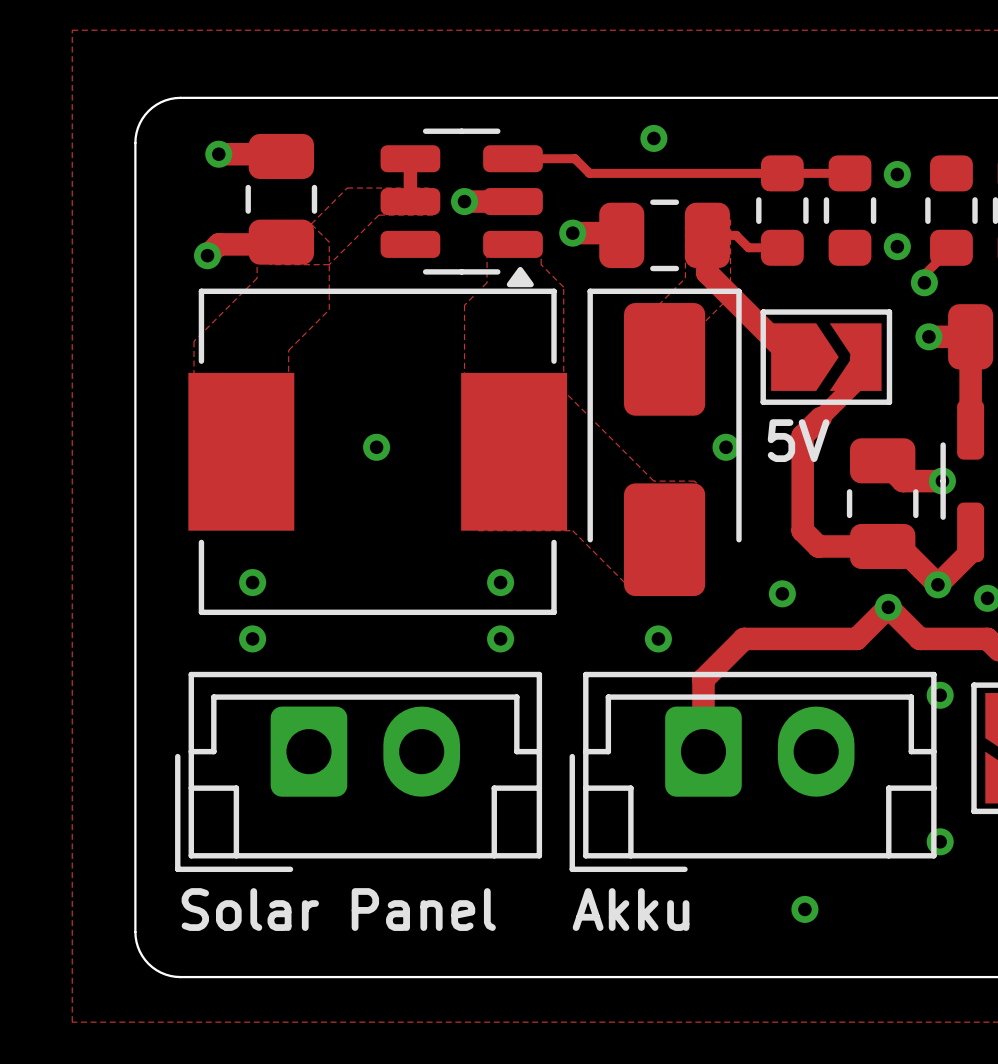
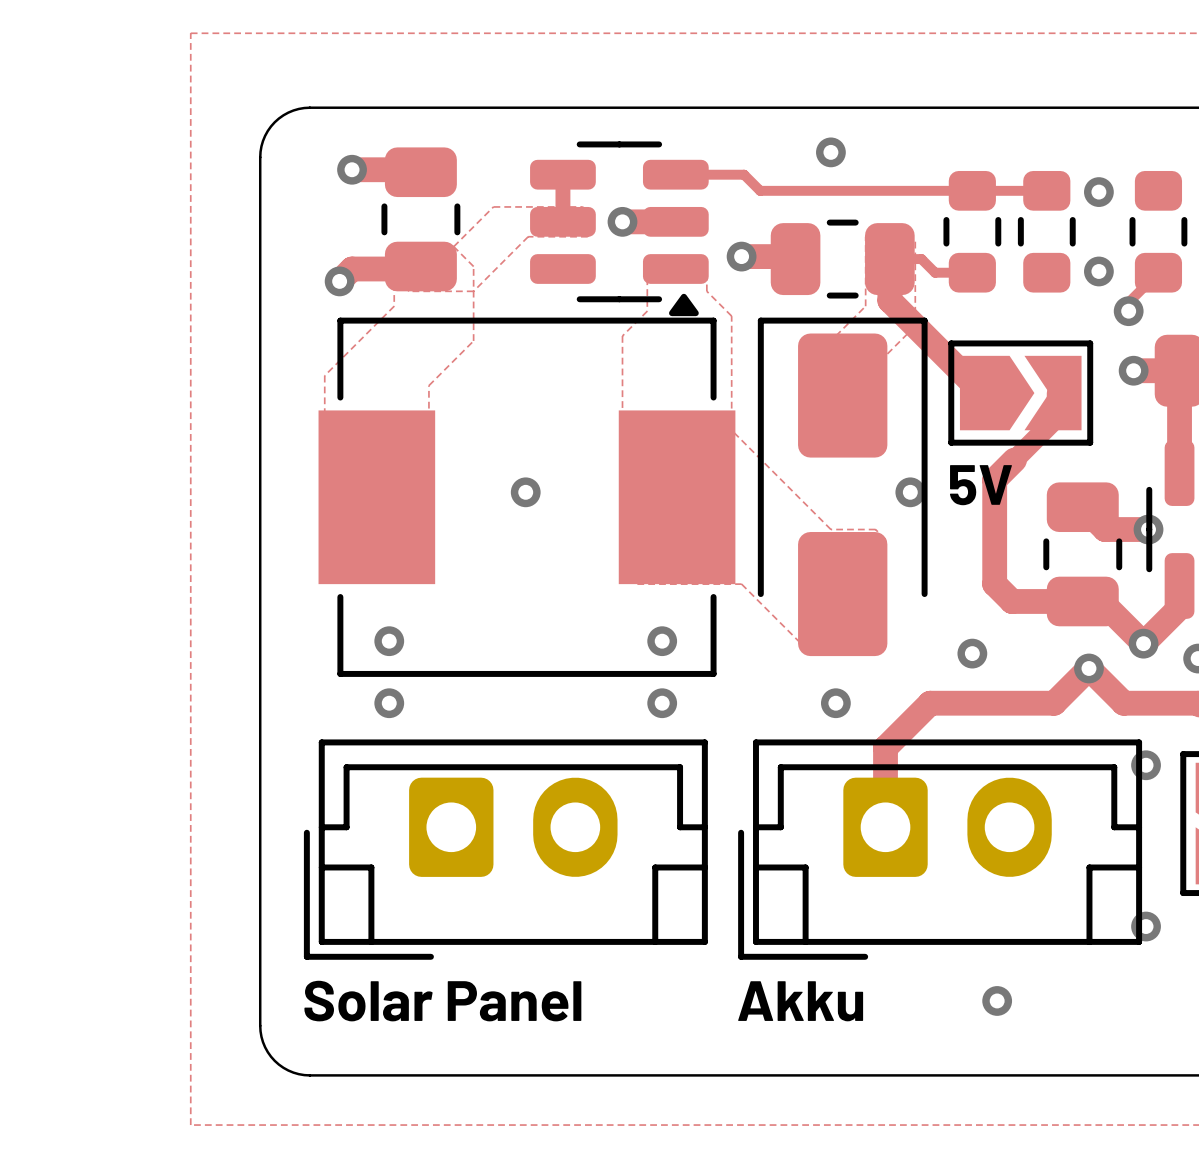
part footprint: [188, 288, 568, 616] -> [318, 317, 736, 677]

